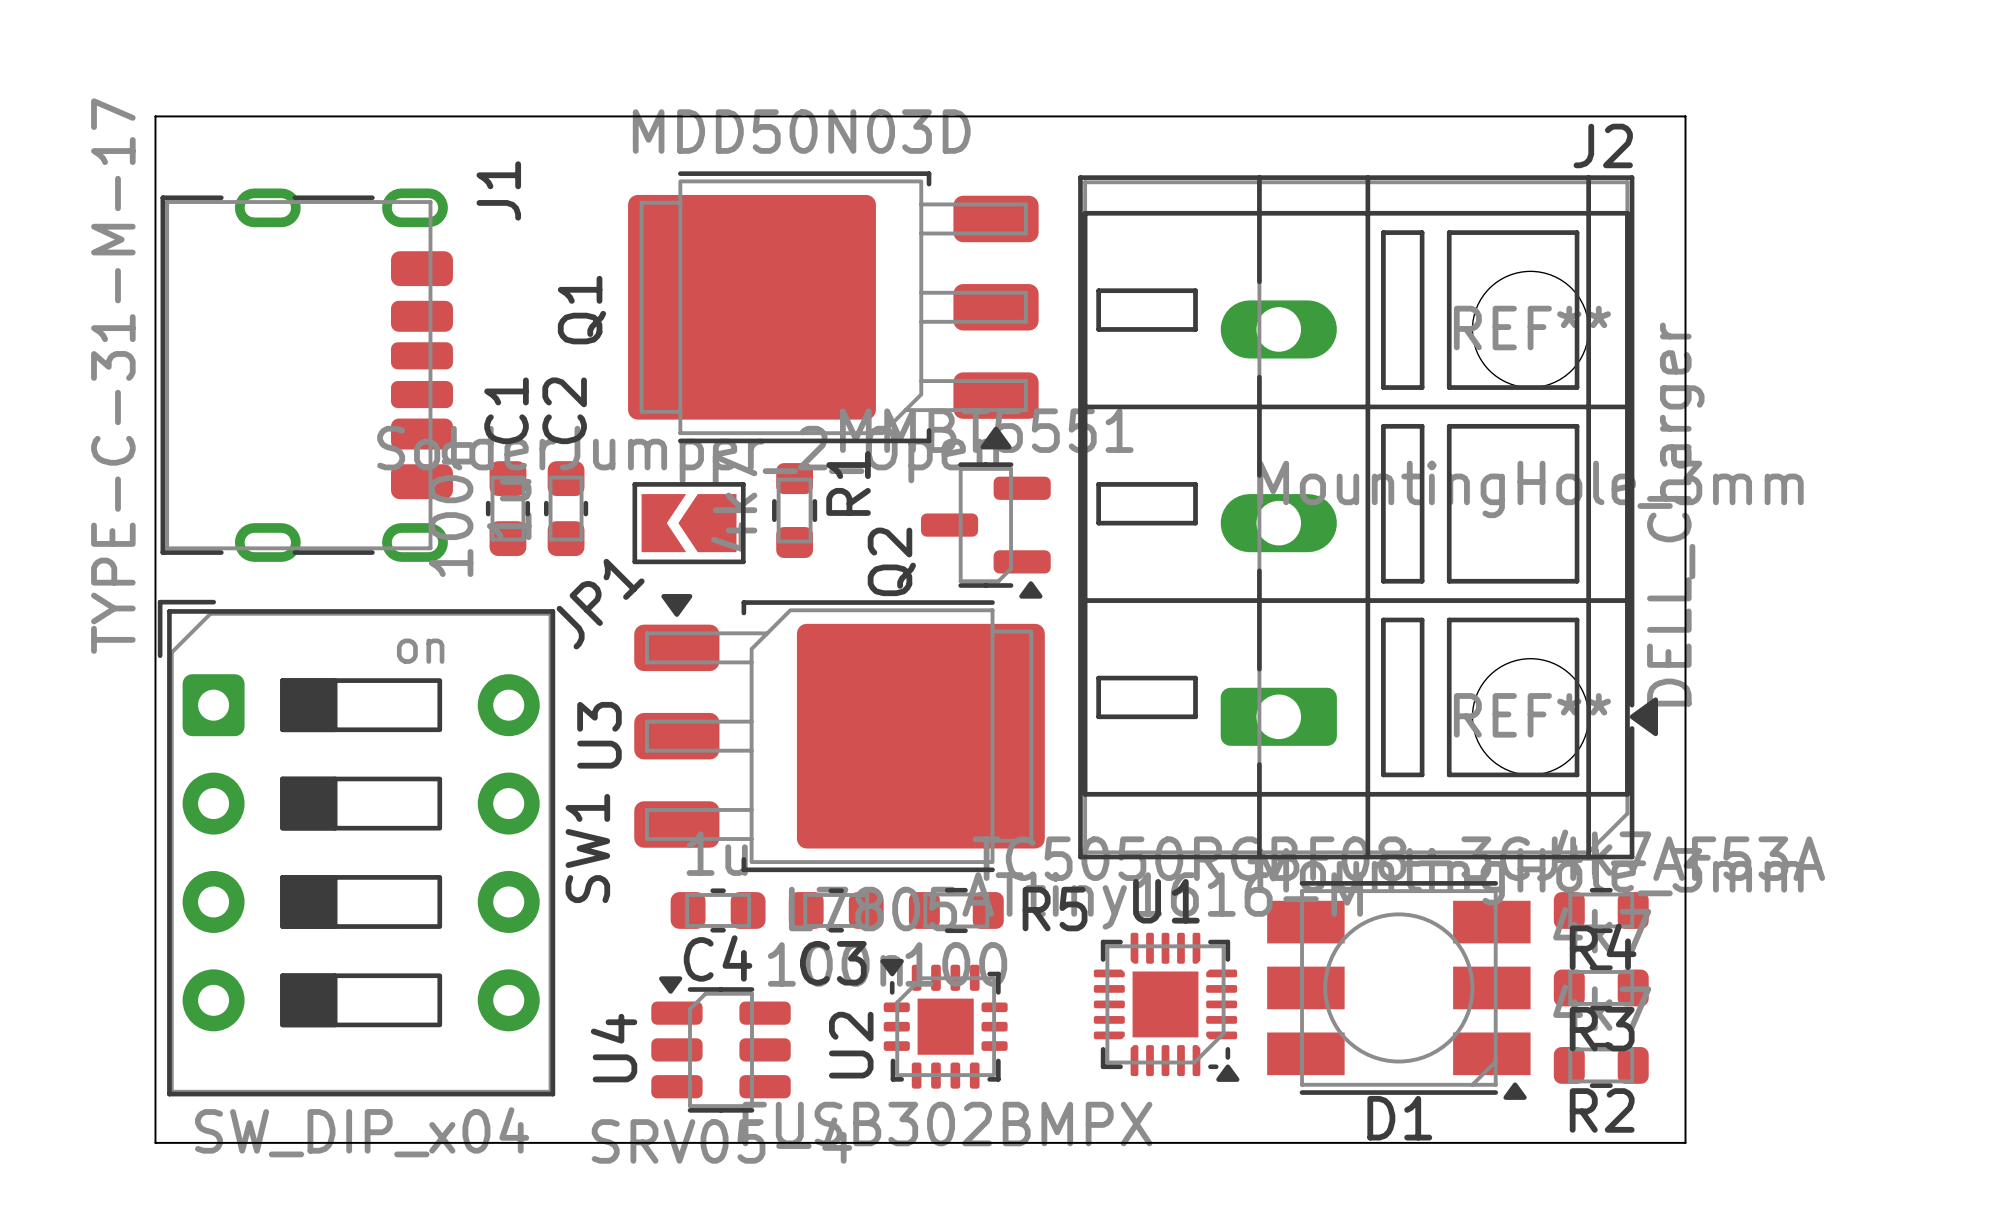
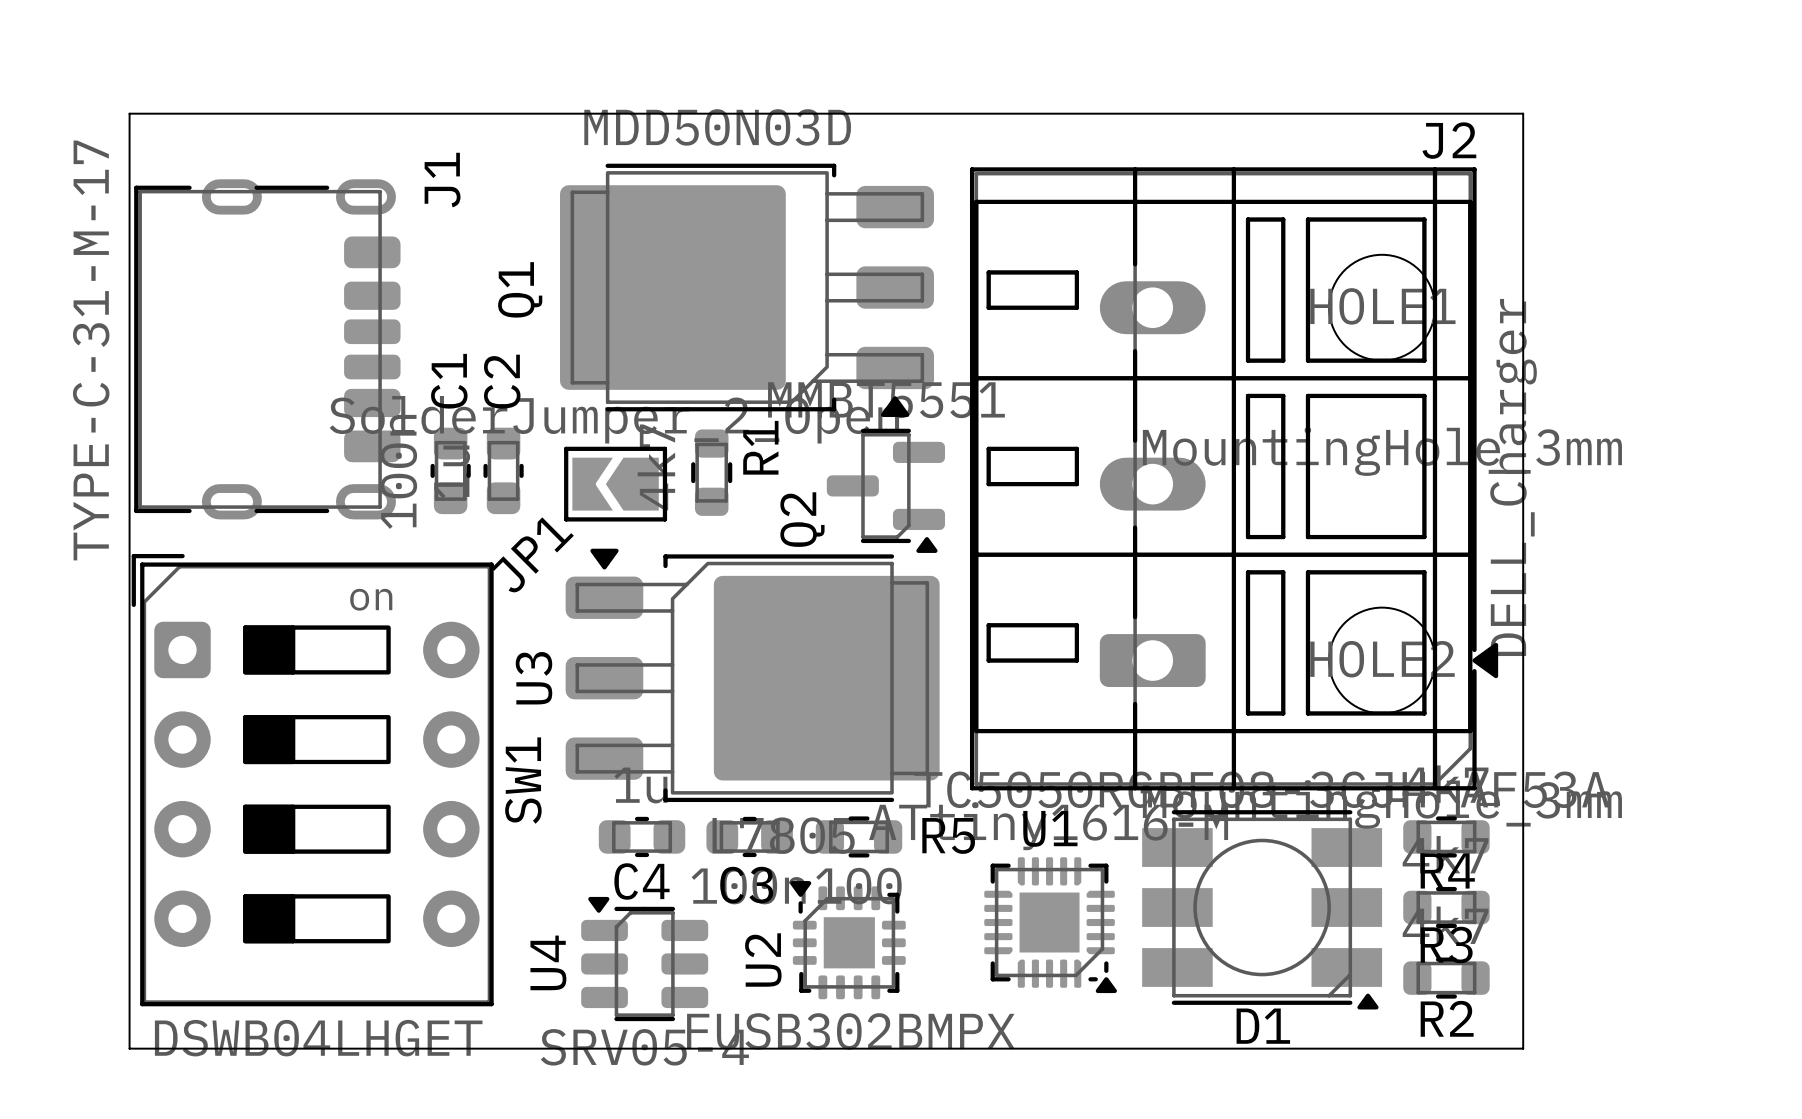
REF** name: REF** (1532, 328) -> HOLE1 (1382, 306)
REF** name: REF** (1532, 715) -> HOLE2 (1382, 659)
SW1 value: SW_DIP_x04 (362, 1132) -> DSWB04LHGET (318, 1038)

